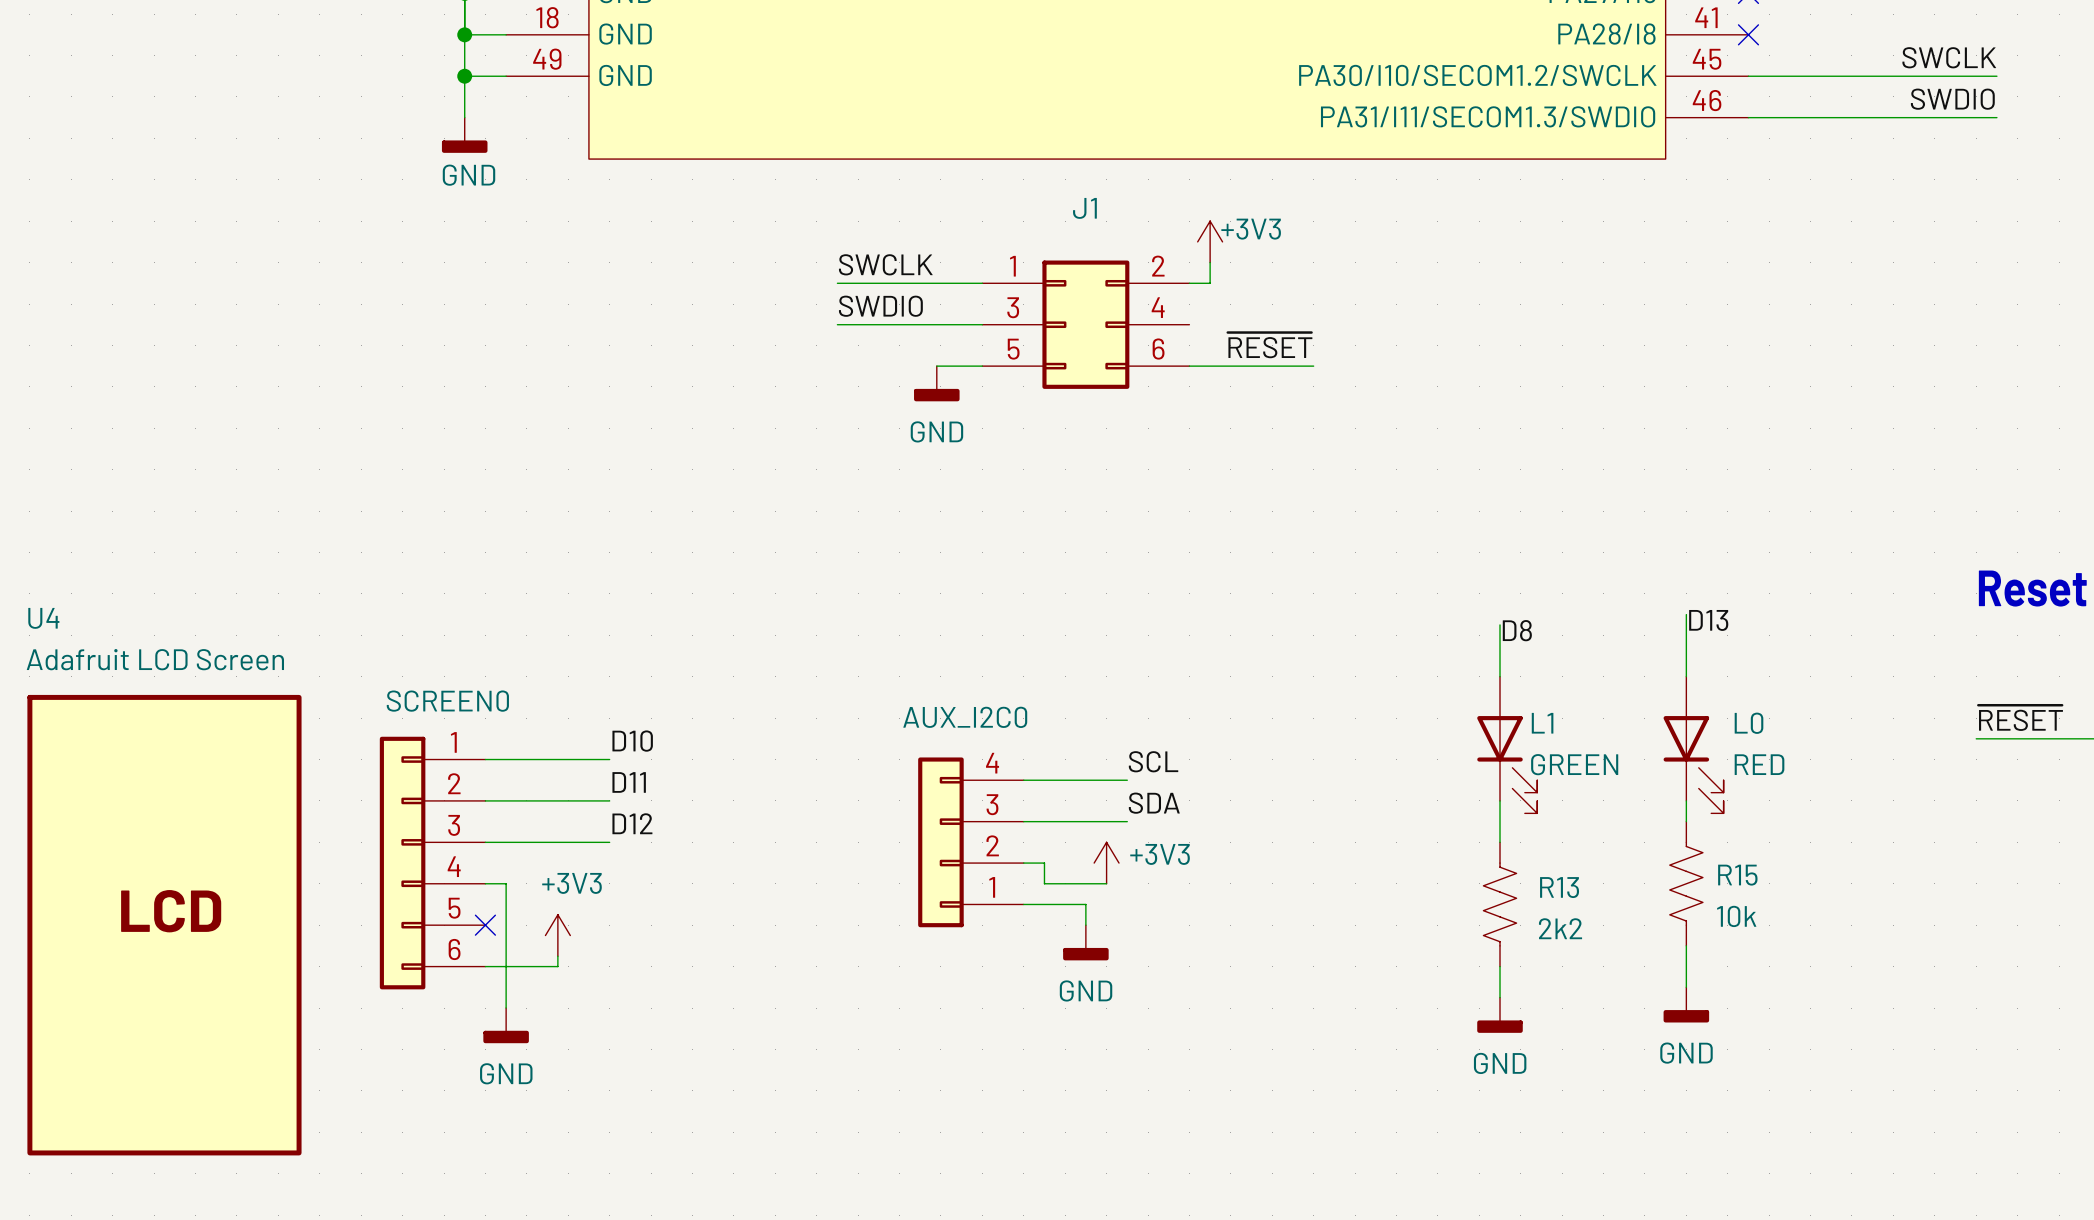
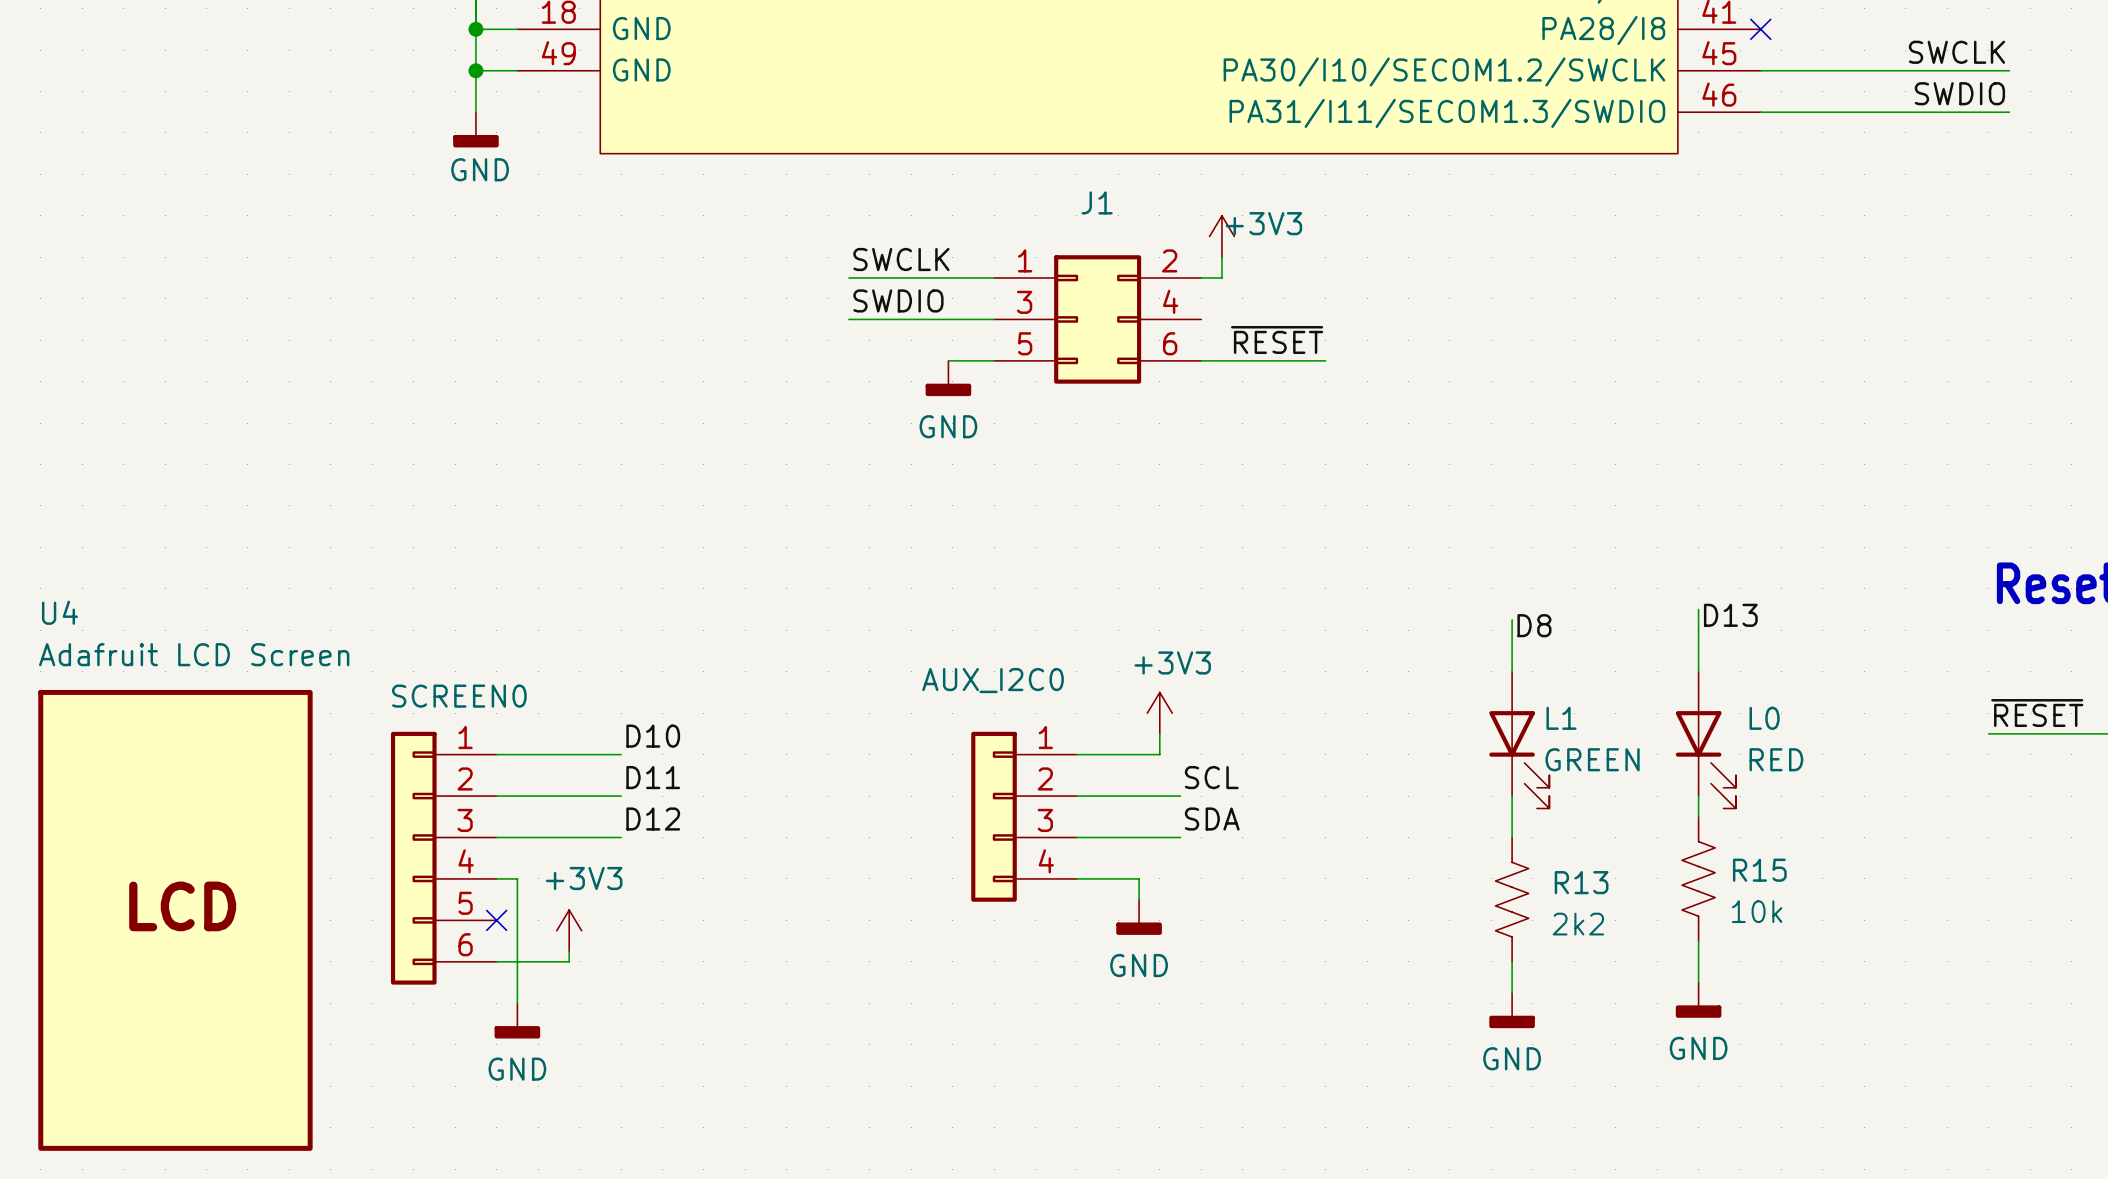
wire: none -> (1159, 733) (1159, 754) (1076, 754)
label position: SCL (1153, 761) -> SCL (1211, 777)
wire: (1023, 780) (1127, 780) -> (1076, 796) (1180, 796)
label position: SDA (1154, 803) -> SDA (1212, 819)
wire: (1023, 821) (1127, 821) -> (1076, 837) (1180, 837)
AUX_I2C0 flip: as is (940, 842) -> up-down (994, 816)
power symbol text position: +3V3 (1160, 854) -> +3V3 (1172, 662)
wire: (1023, 863) (1044, 863) (1044, 883) (1065, 883) -> none
power symbol position: +3V3 (1106, 863) -> +3V3 (1159, 713)
wire: none -> (1118, 878) (1139, 878) (1139, 899)
wire: (1023, 904) (1085, 904) (1085, 925) -> none
power symbol position: GND (1085, 942) -> GND (1139, 917)

